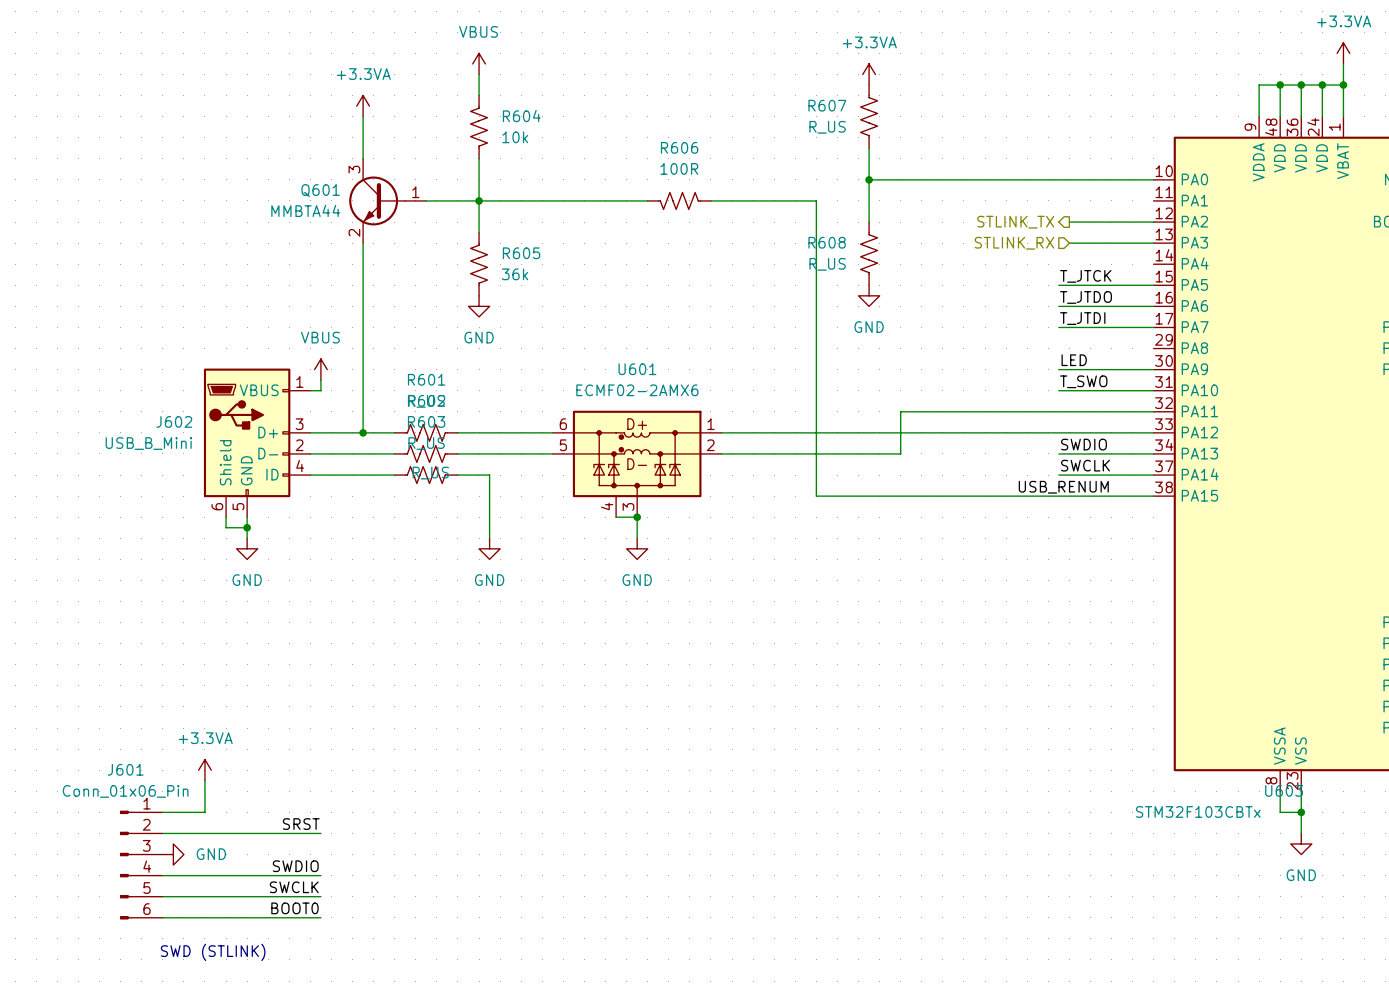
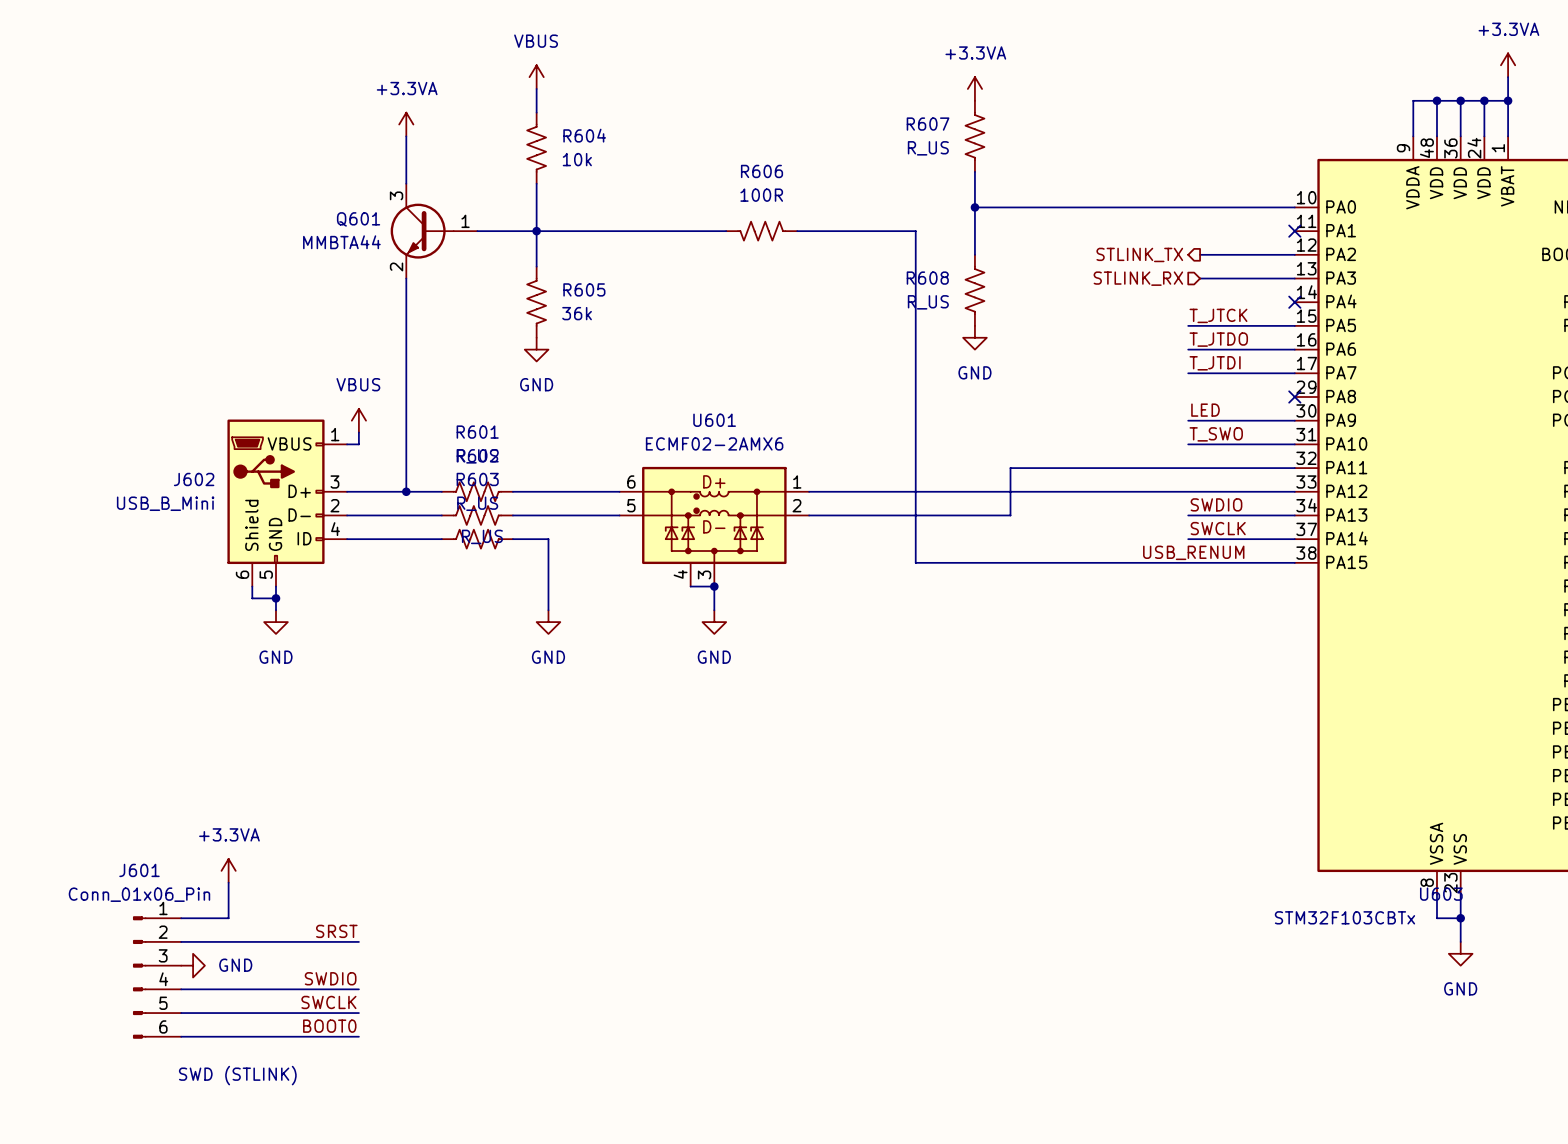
no-connect mark: none -> (1294, 231)
no-connect mark: none -> (1294, 302)
no-connect mark: none -> (1294, 396)

